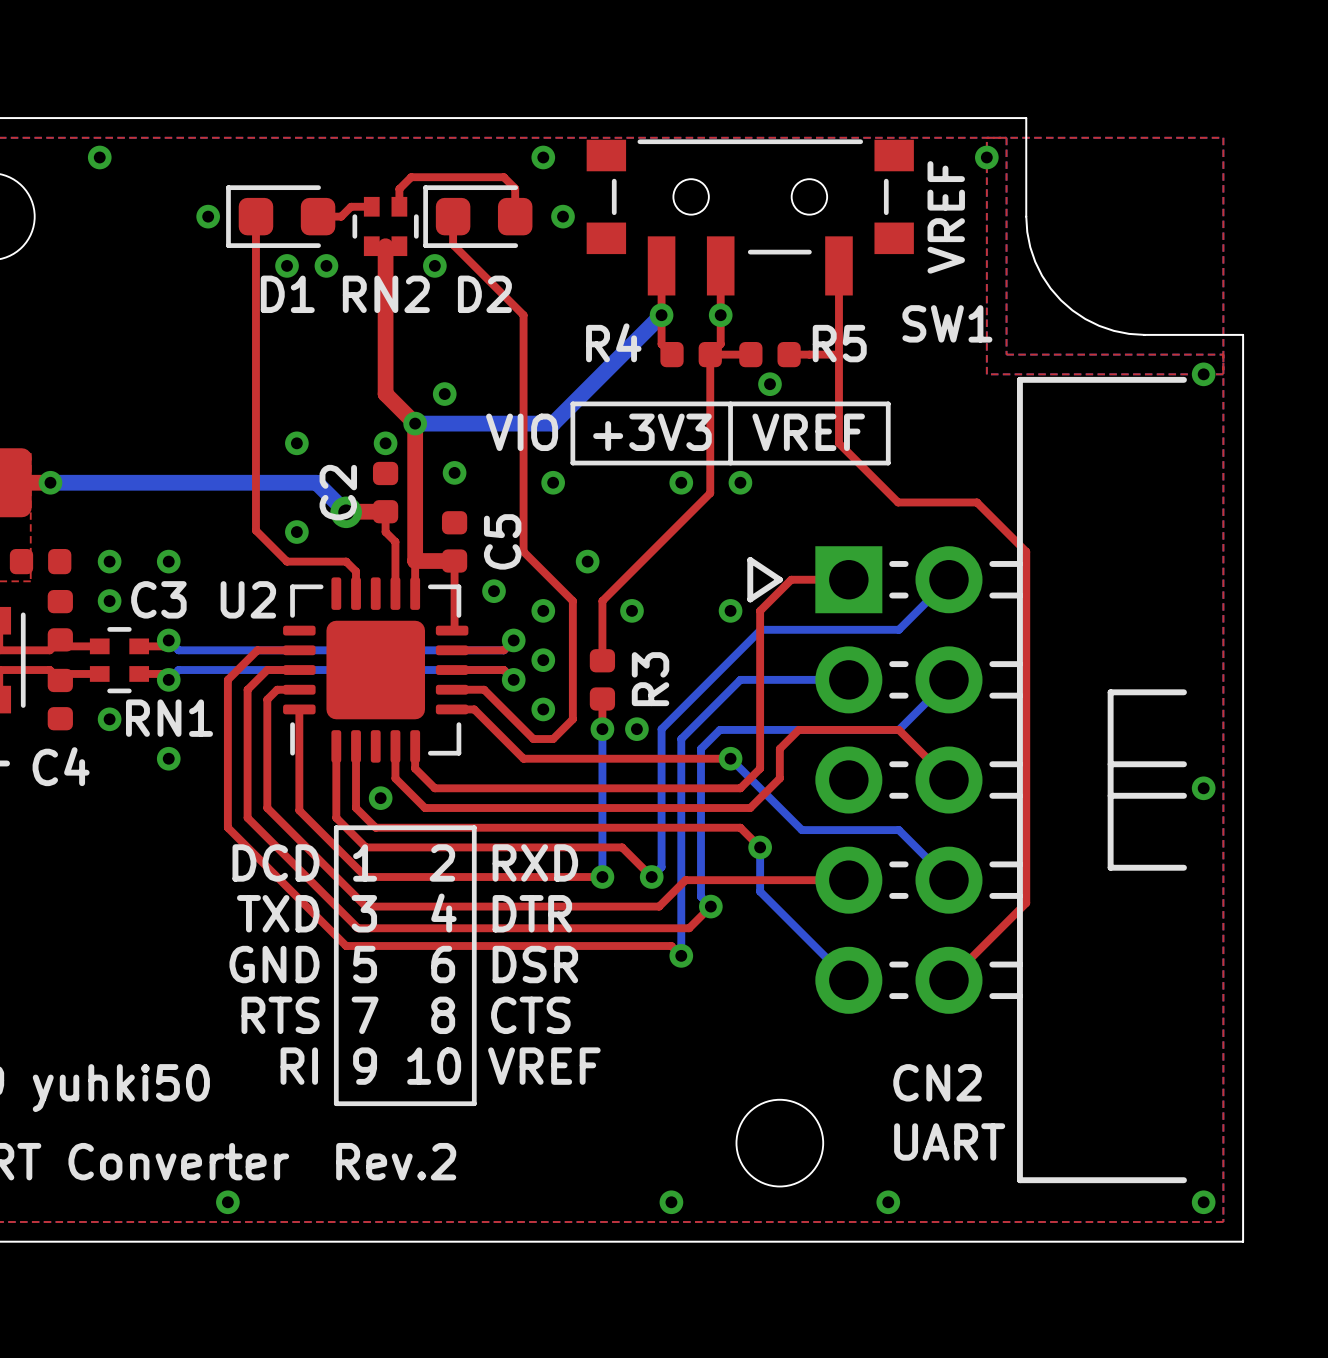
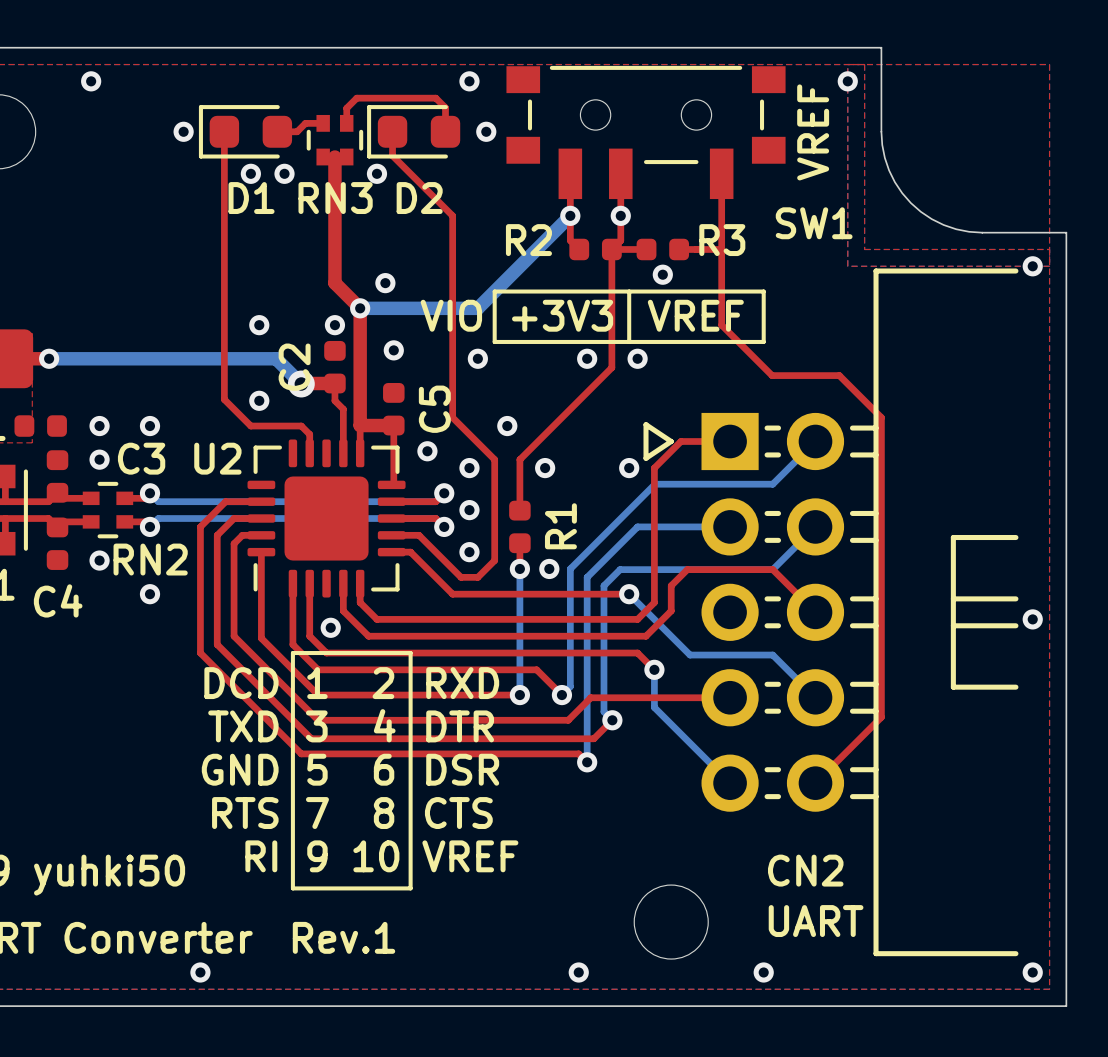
RN2 name: RN2 (386, 294) -> RN3 (335, 198)
R4 name: R4 (613, 342) -> R2 (528, 240)
R5 name: R5 (839, 343) -> R3 (722, 240)
R3 name: R3 (650, 679) -> R1 (560, 526)
RN1 name: RN1 (169, 718) -> RN2 (150, 559)
text: Rev.2 (396, 1161) -> Rev.1 (344, 937)

